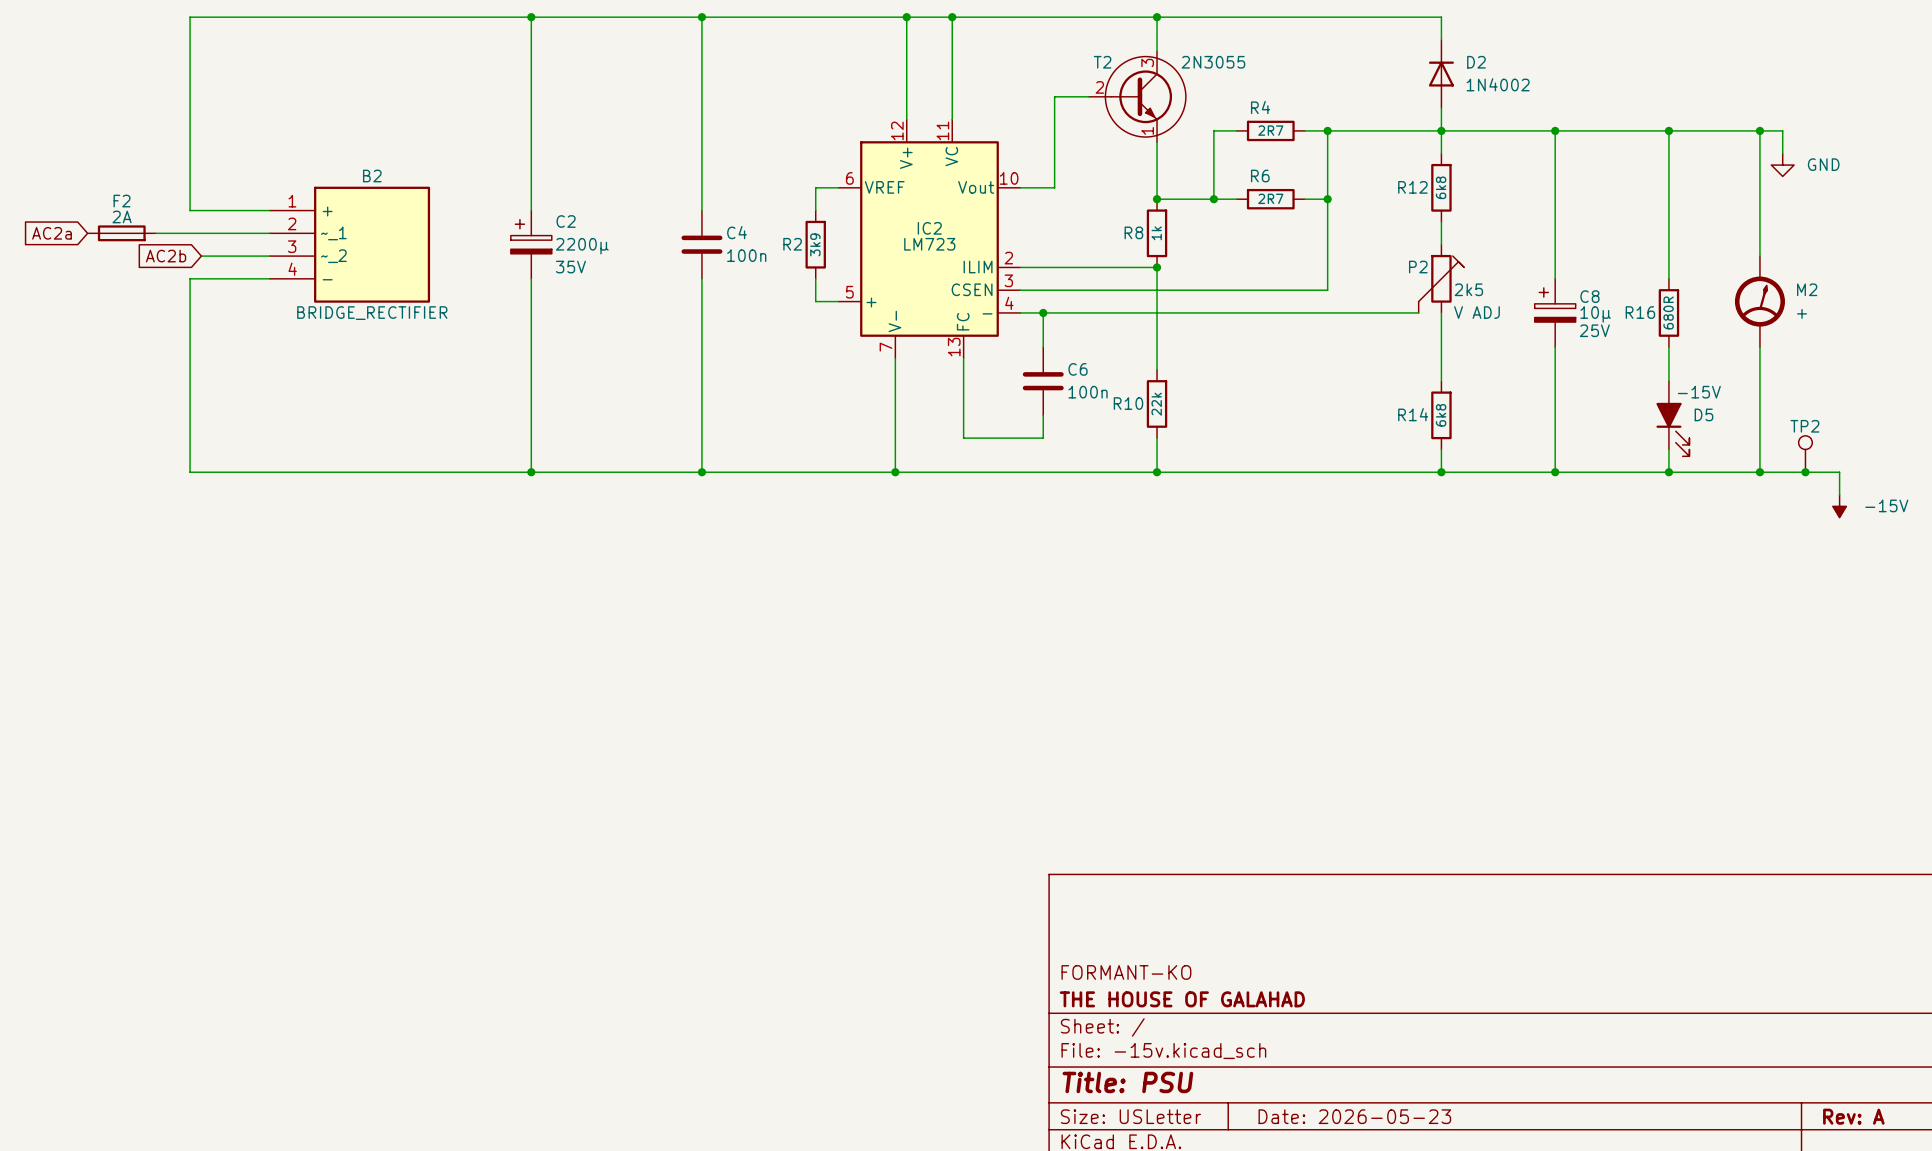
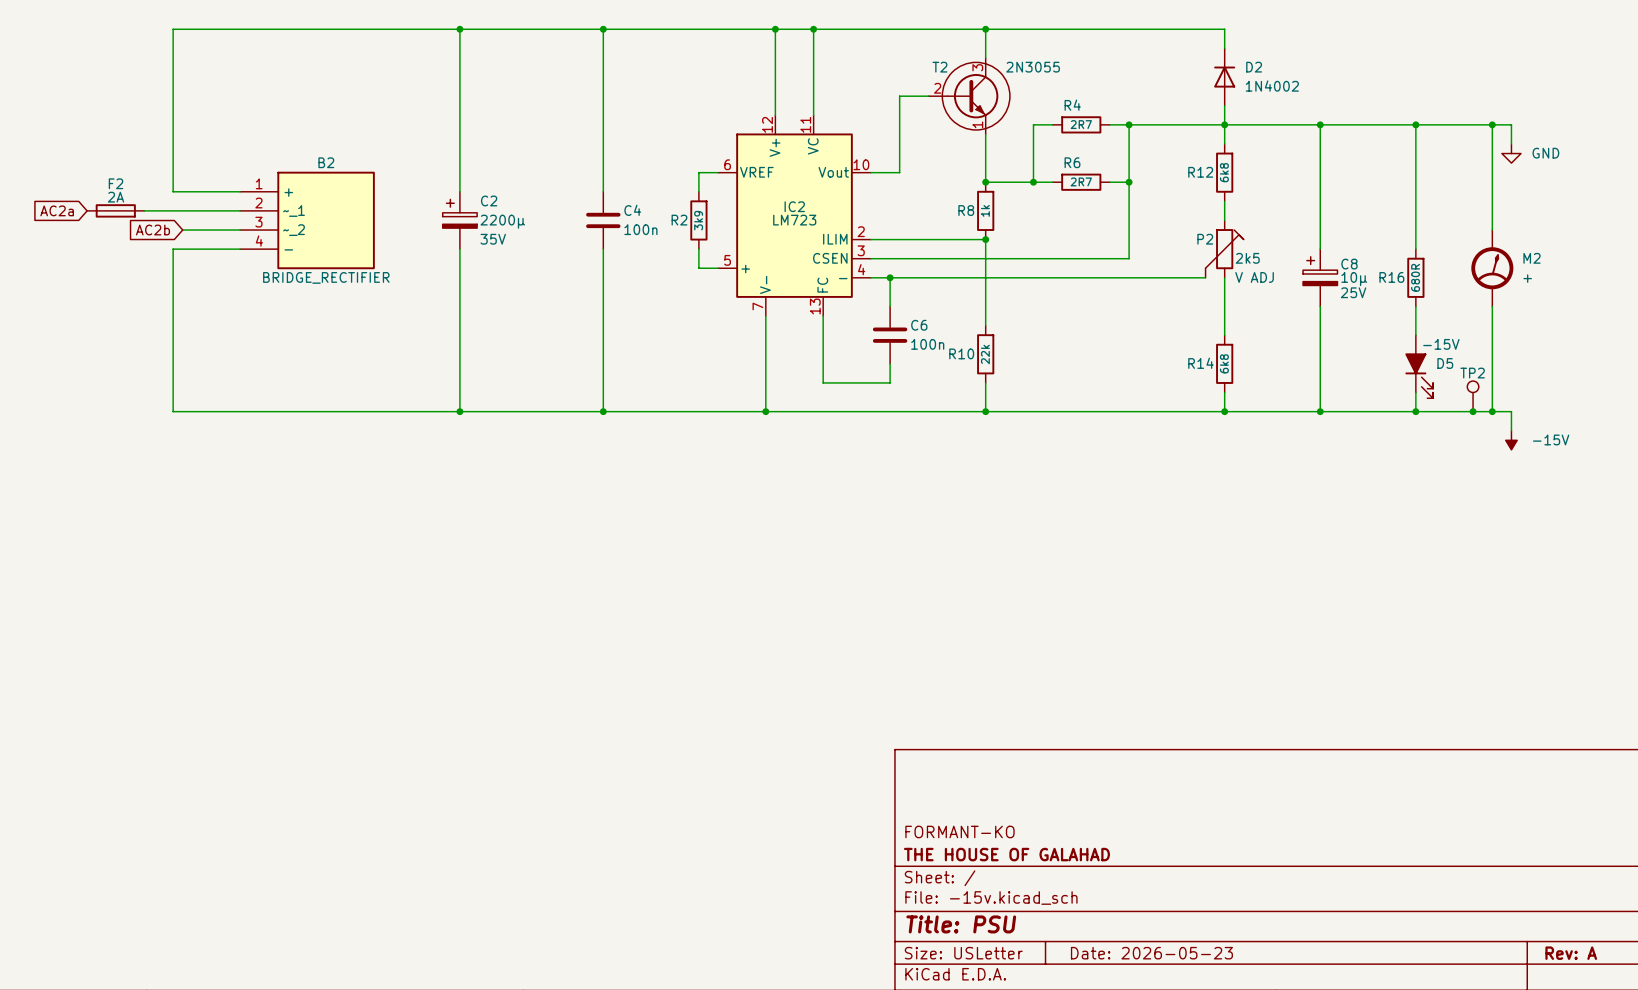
TP2 position: (1805, 454) -> (1473, 396)
junction: none -> (1473, 411)
wire: (1782, 472) (1839, 472) (1839, 494) -> (1511, 411) (1511, 430)
junction: (1805, 472) -> none
power symbol position: -15V (1839, 506) -> -15V (1511, 440)

